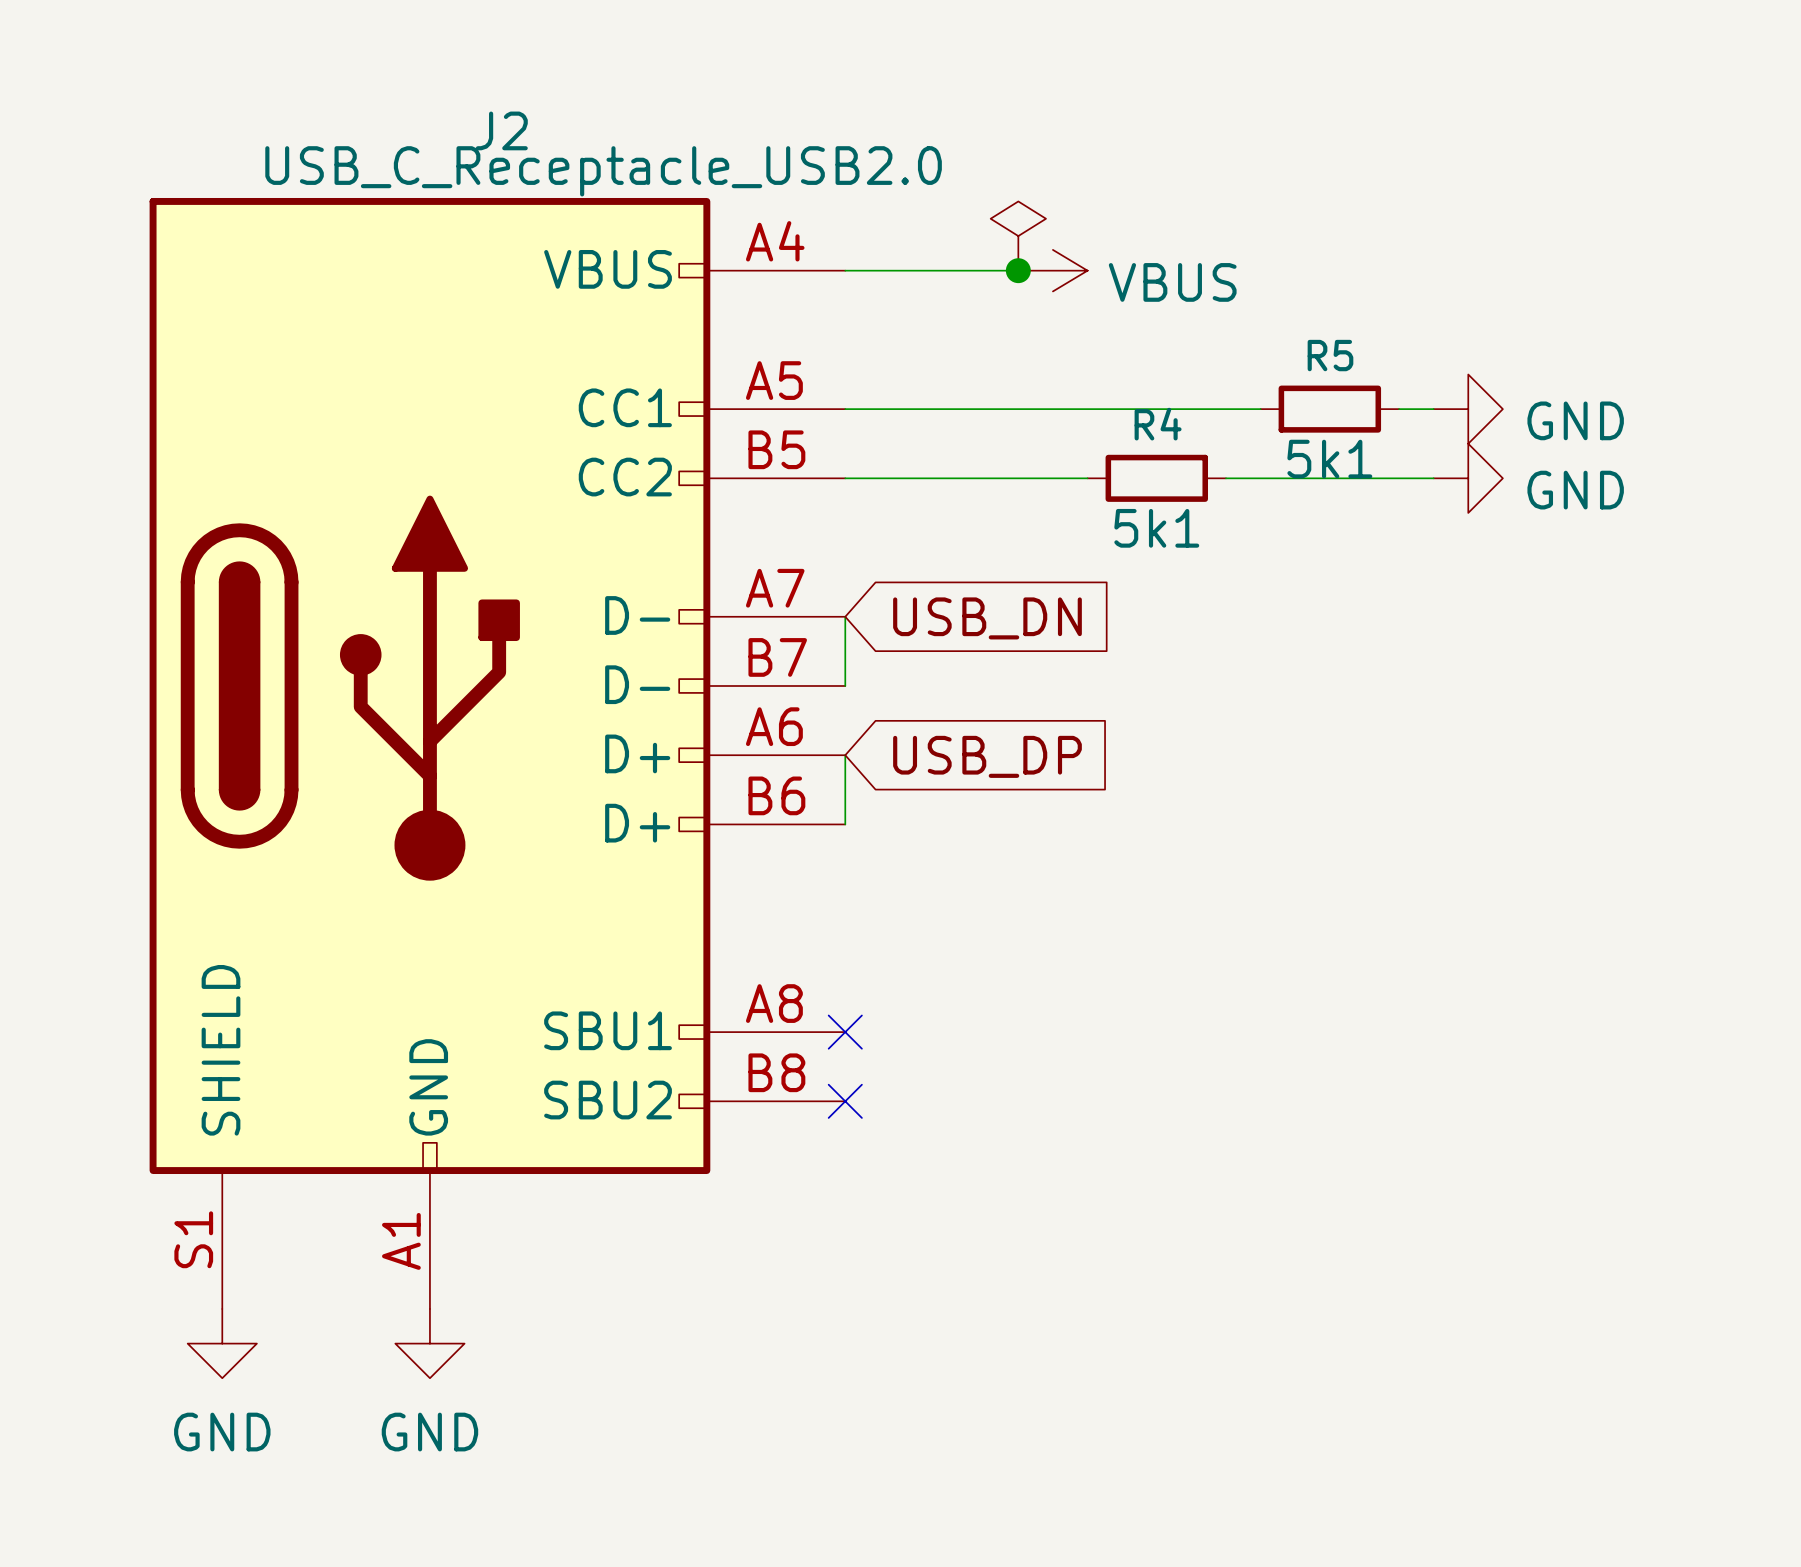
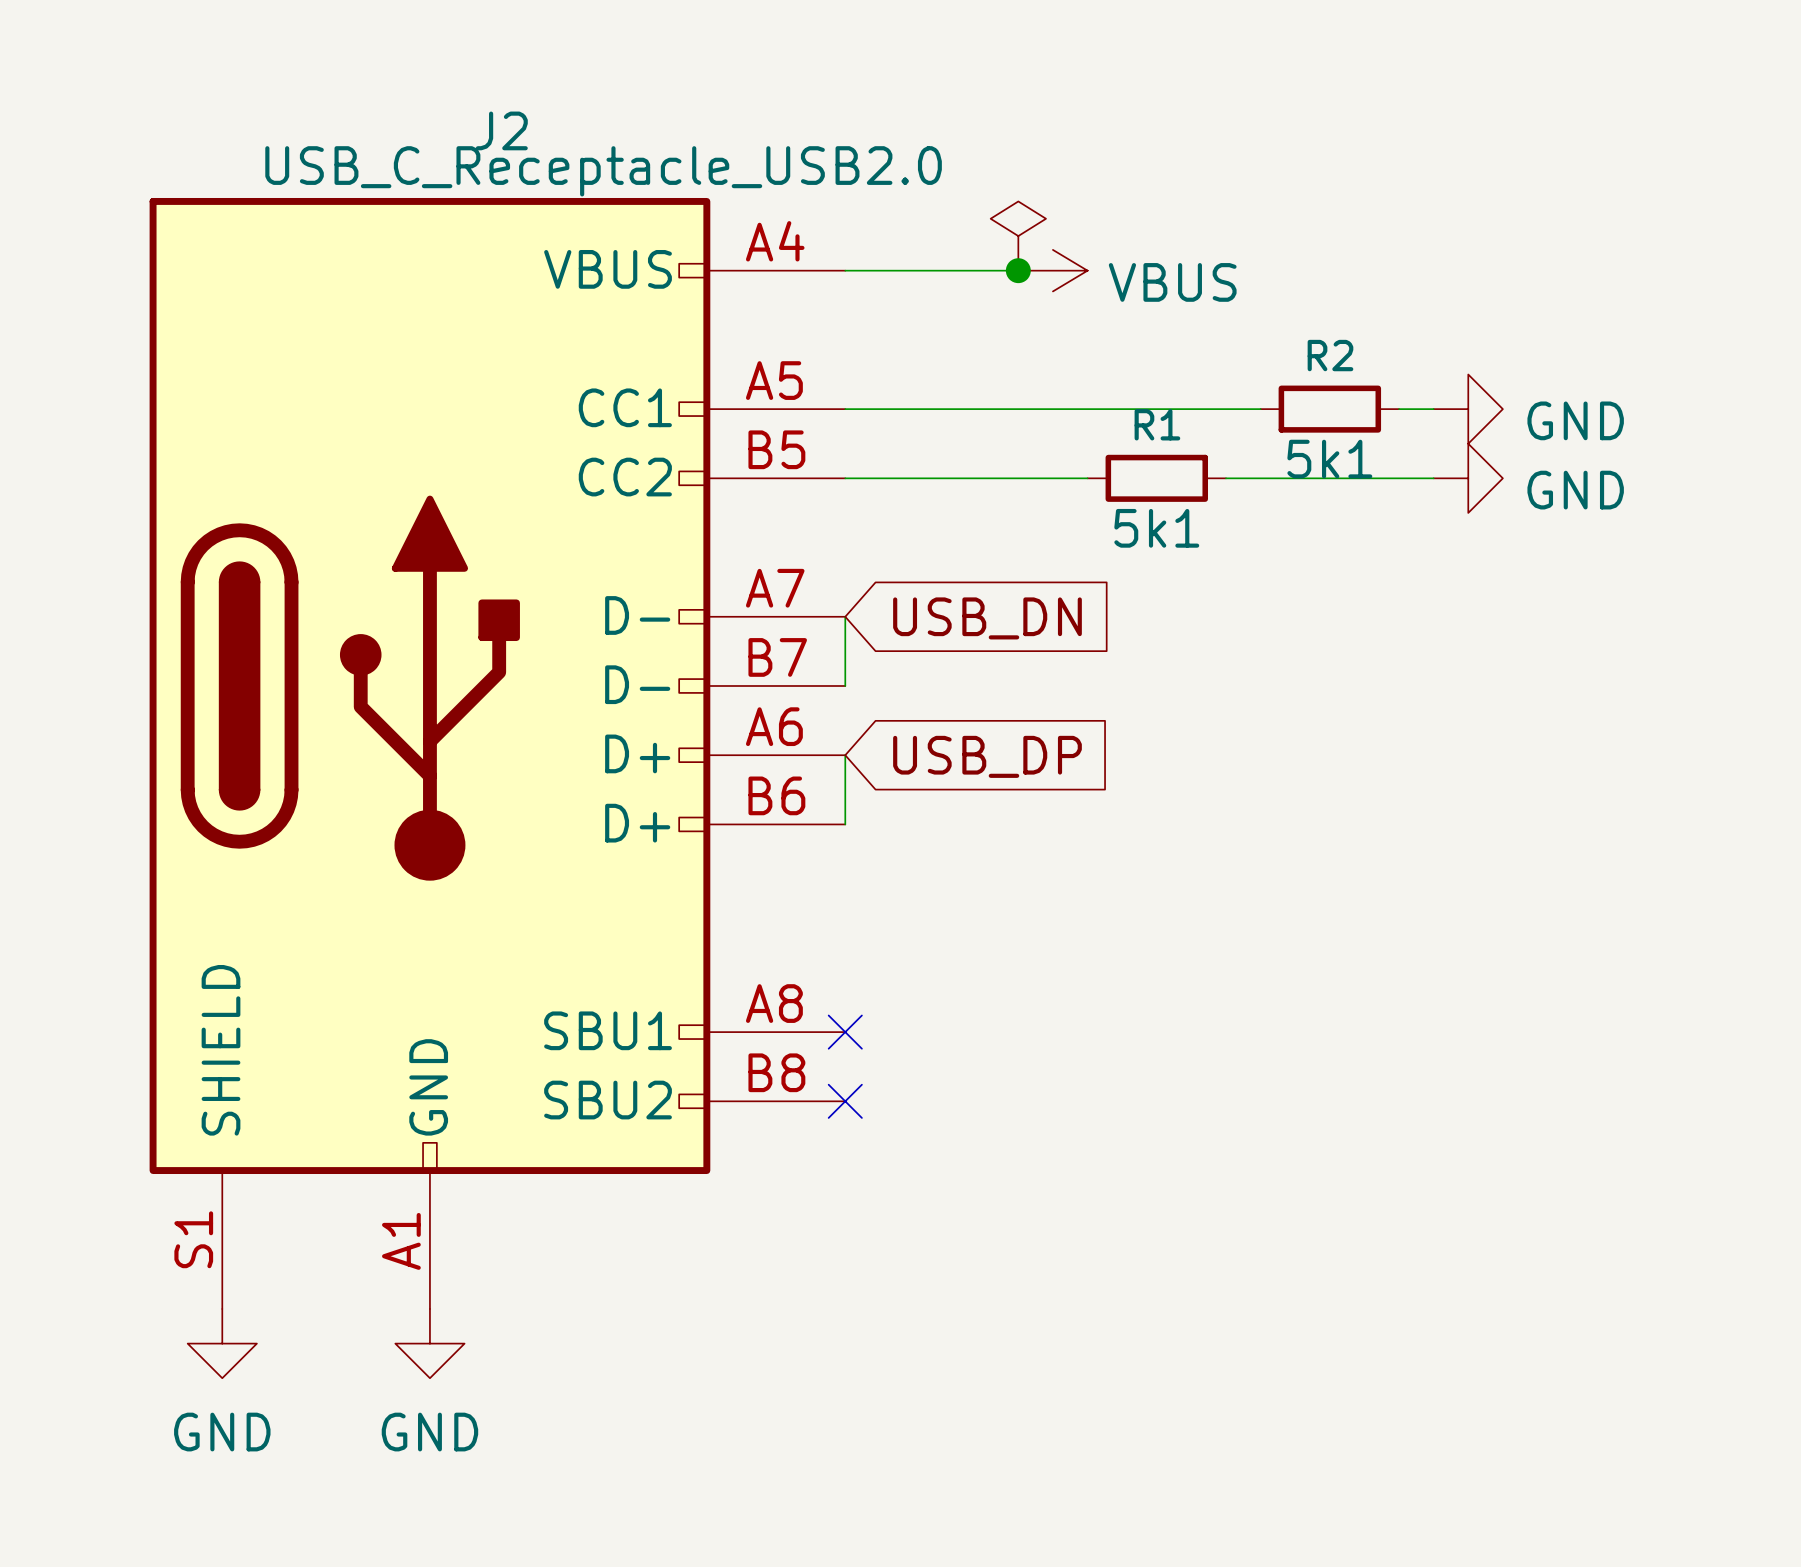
R5 name: R5 (1330, 355) -> R2 (1330, 355)
R4 name: R4 (1158, 424) -> R1 (1157, 424)

